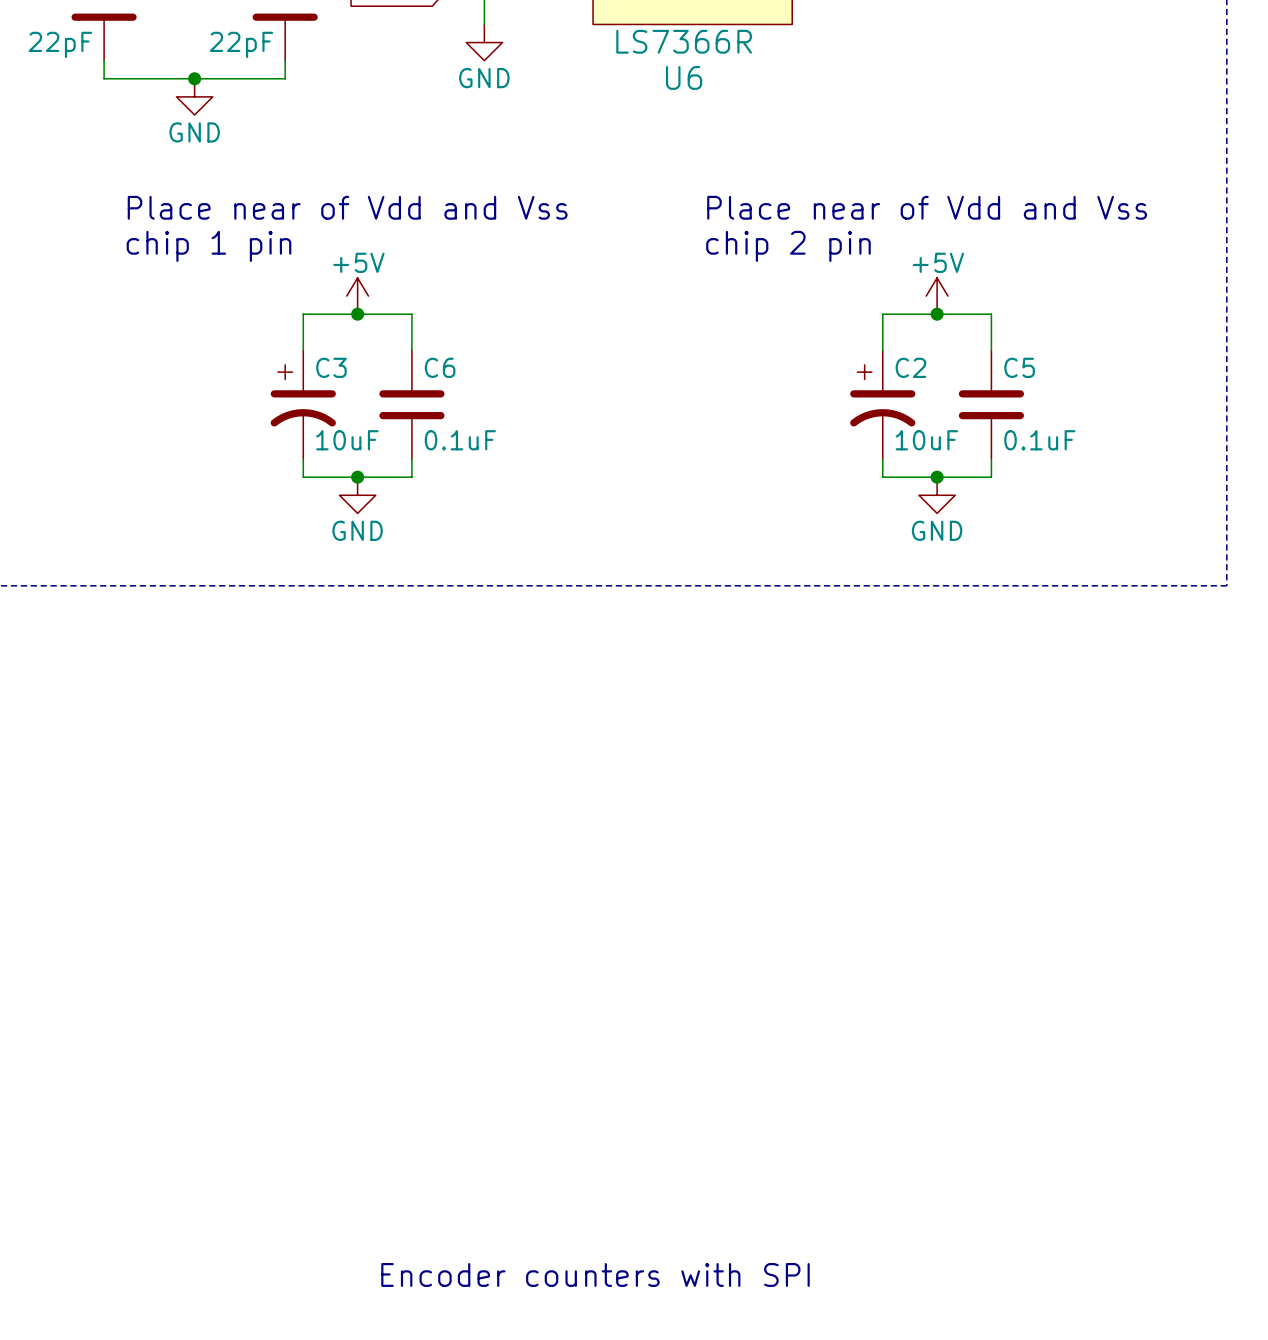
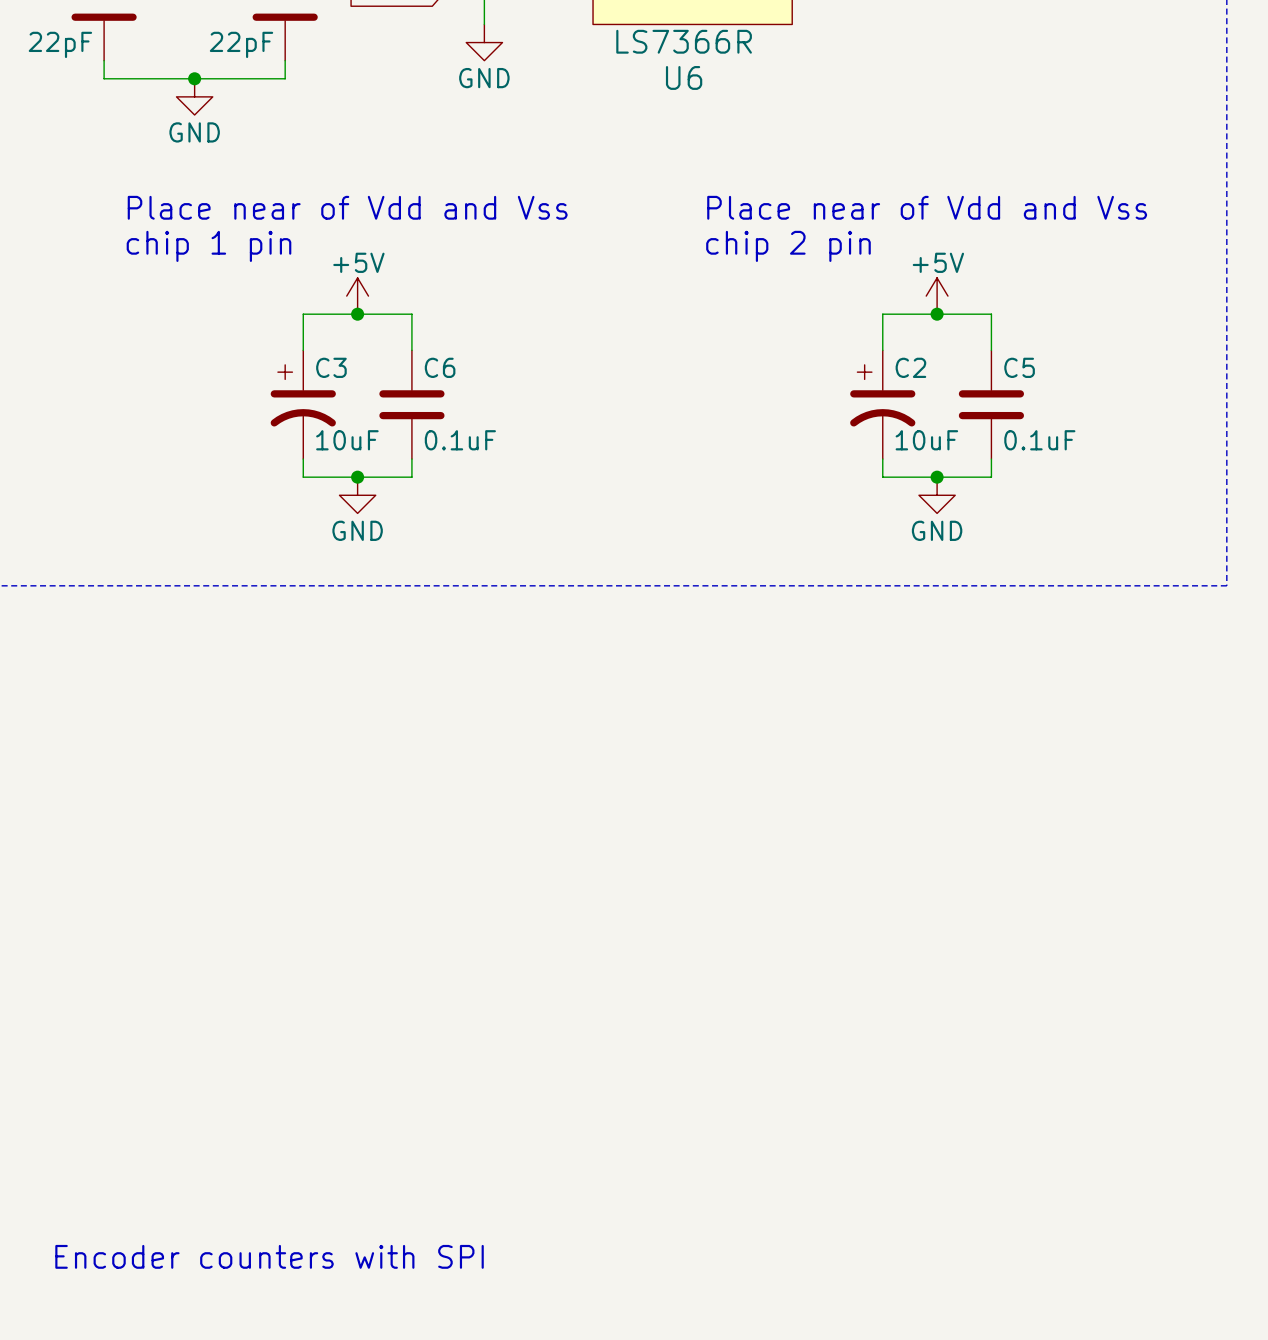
text position: Encoder counters with SPI (595, 1274) -> Encoder counters with SPI (269, 1256)

